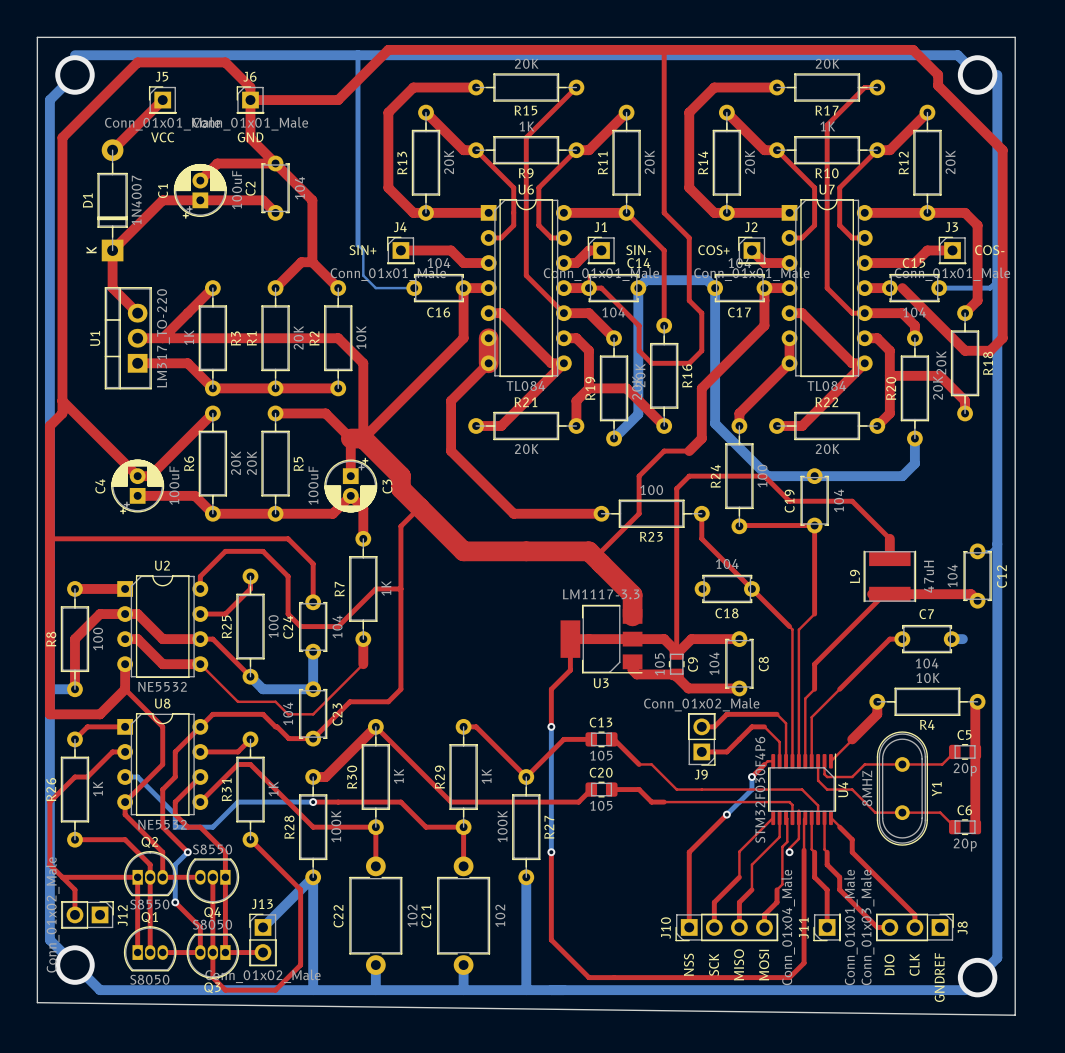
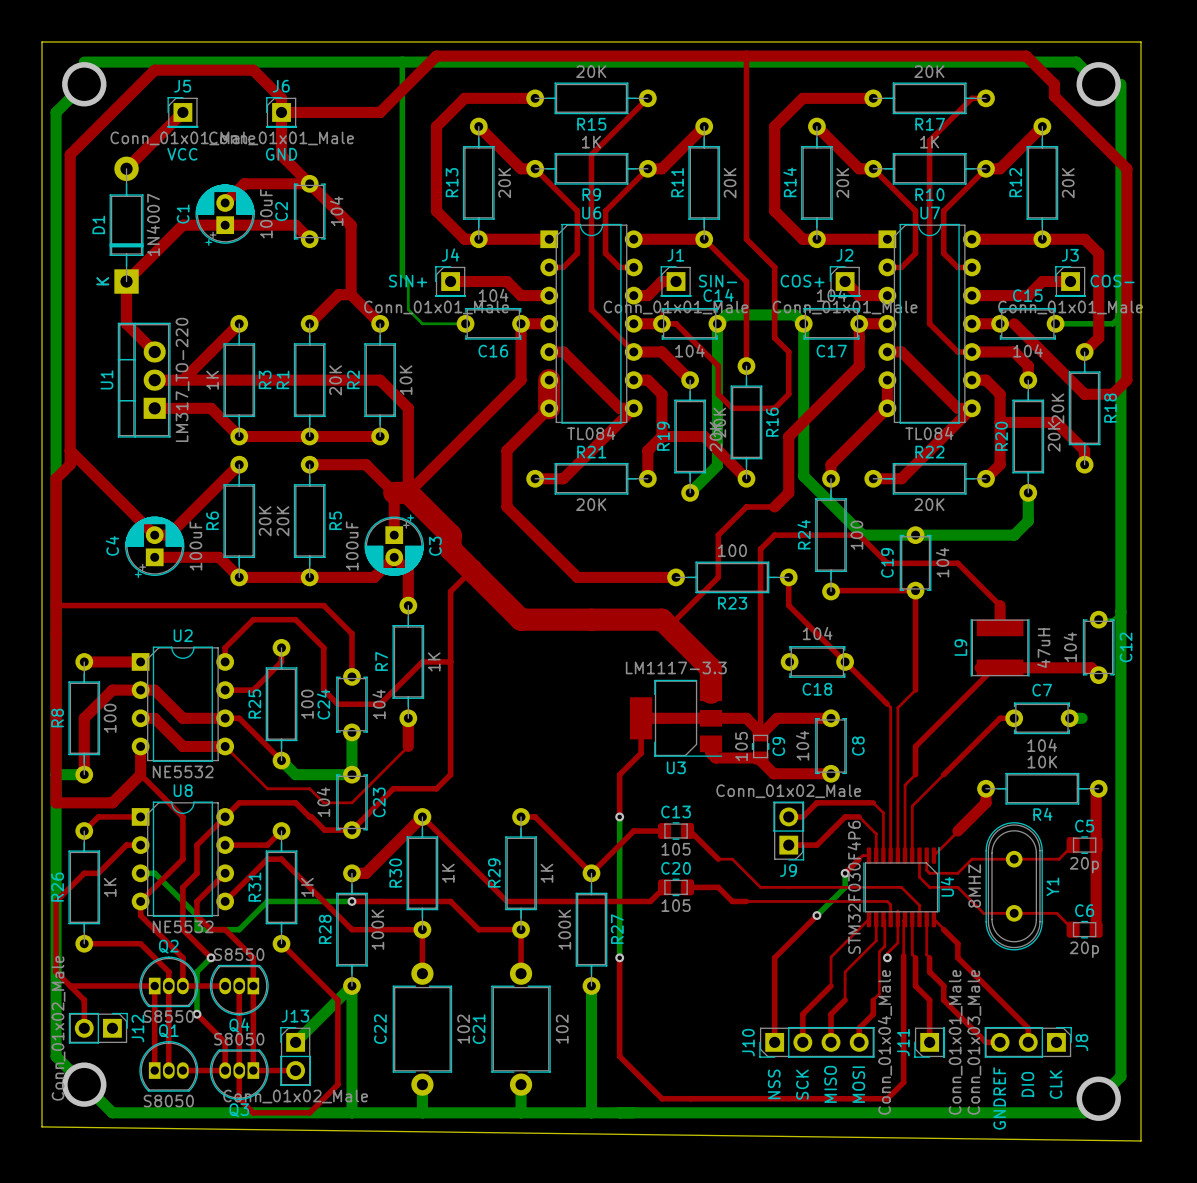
text: DIO (889, 964) -> none
text: CLK (914, 964) -> DIO (1027, 1084)
text: none -> CLK (1056, 1084)
text position: GNDREF (939, 977) -> GNDREF (999, 1098)

